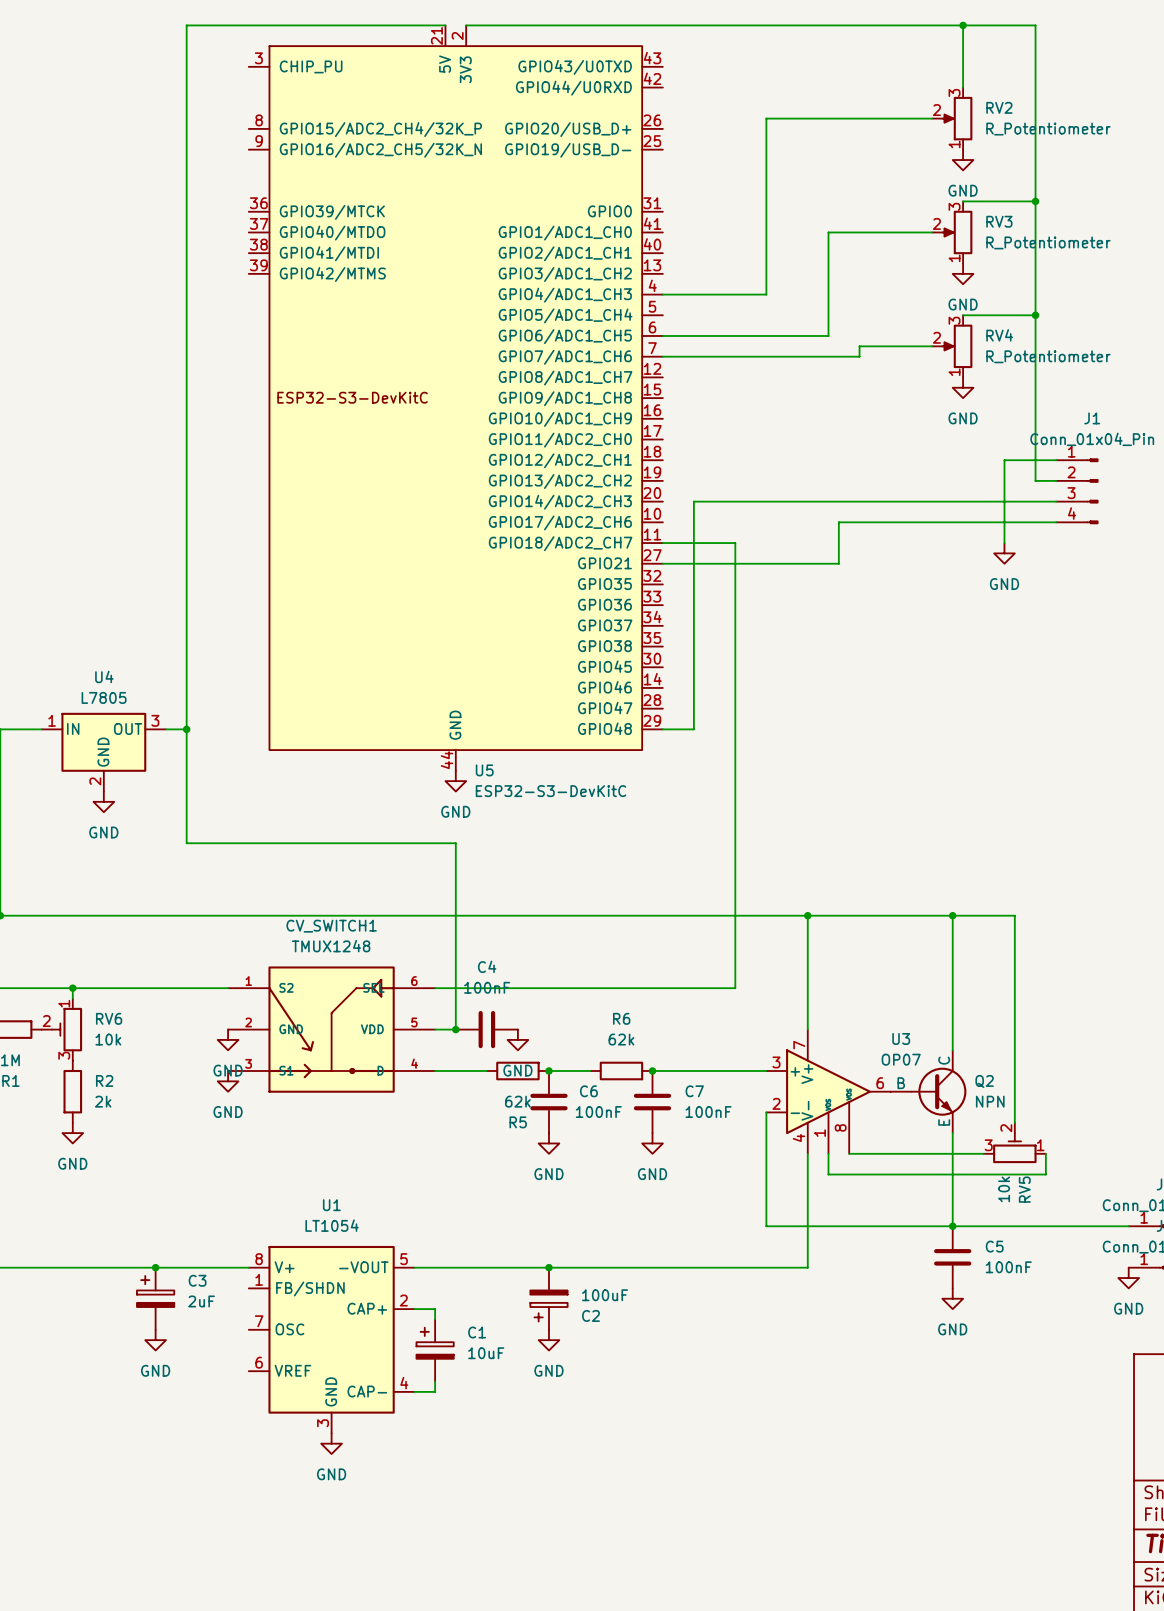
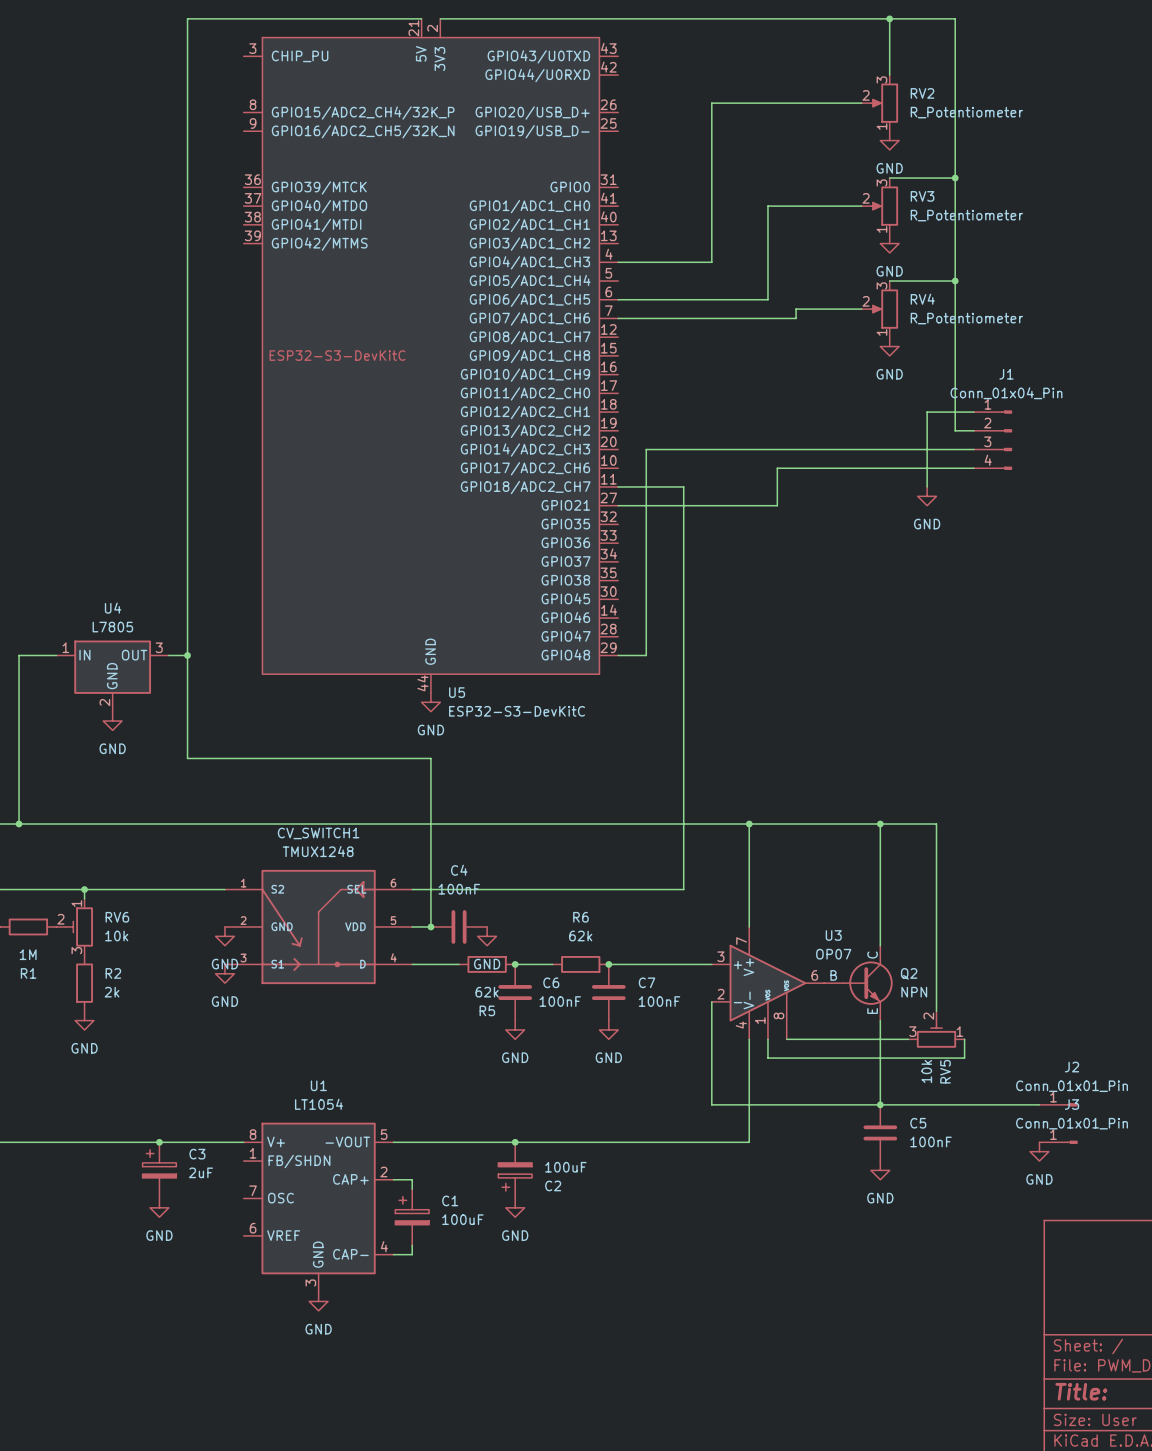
C1 value: 10uF (486, 1353) -> 100uF (462, 1219)

